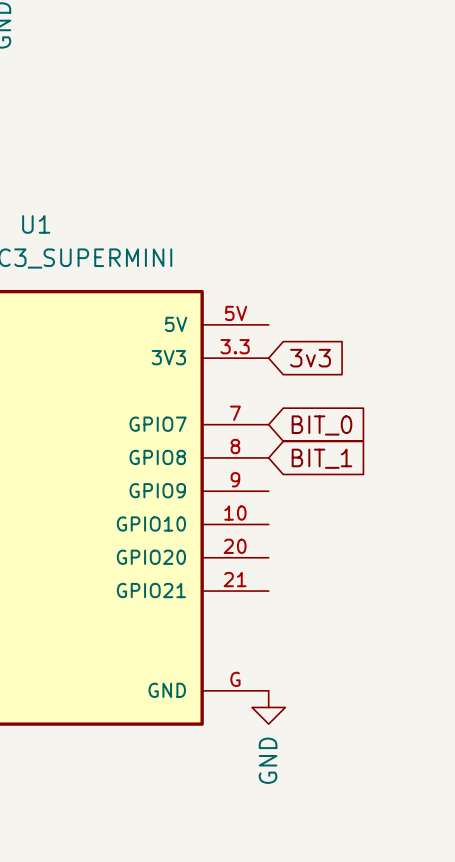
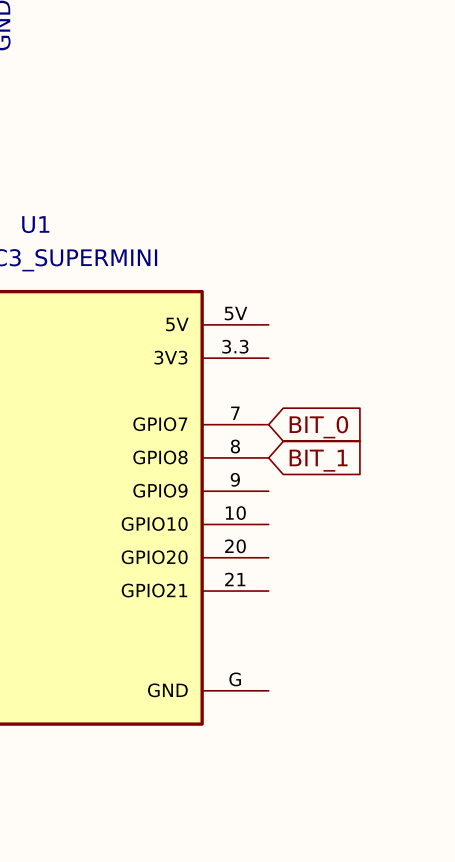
global label: 3v3 (310, 358) -> none
power symbol: GND (268, 707) -> none

